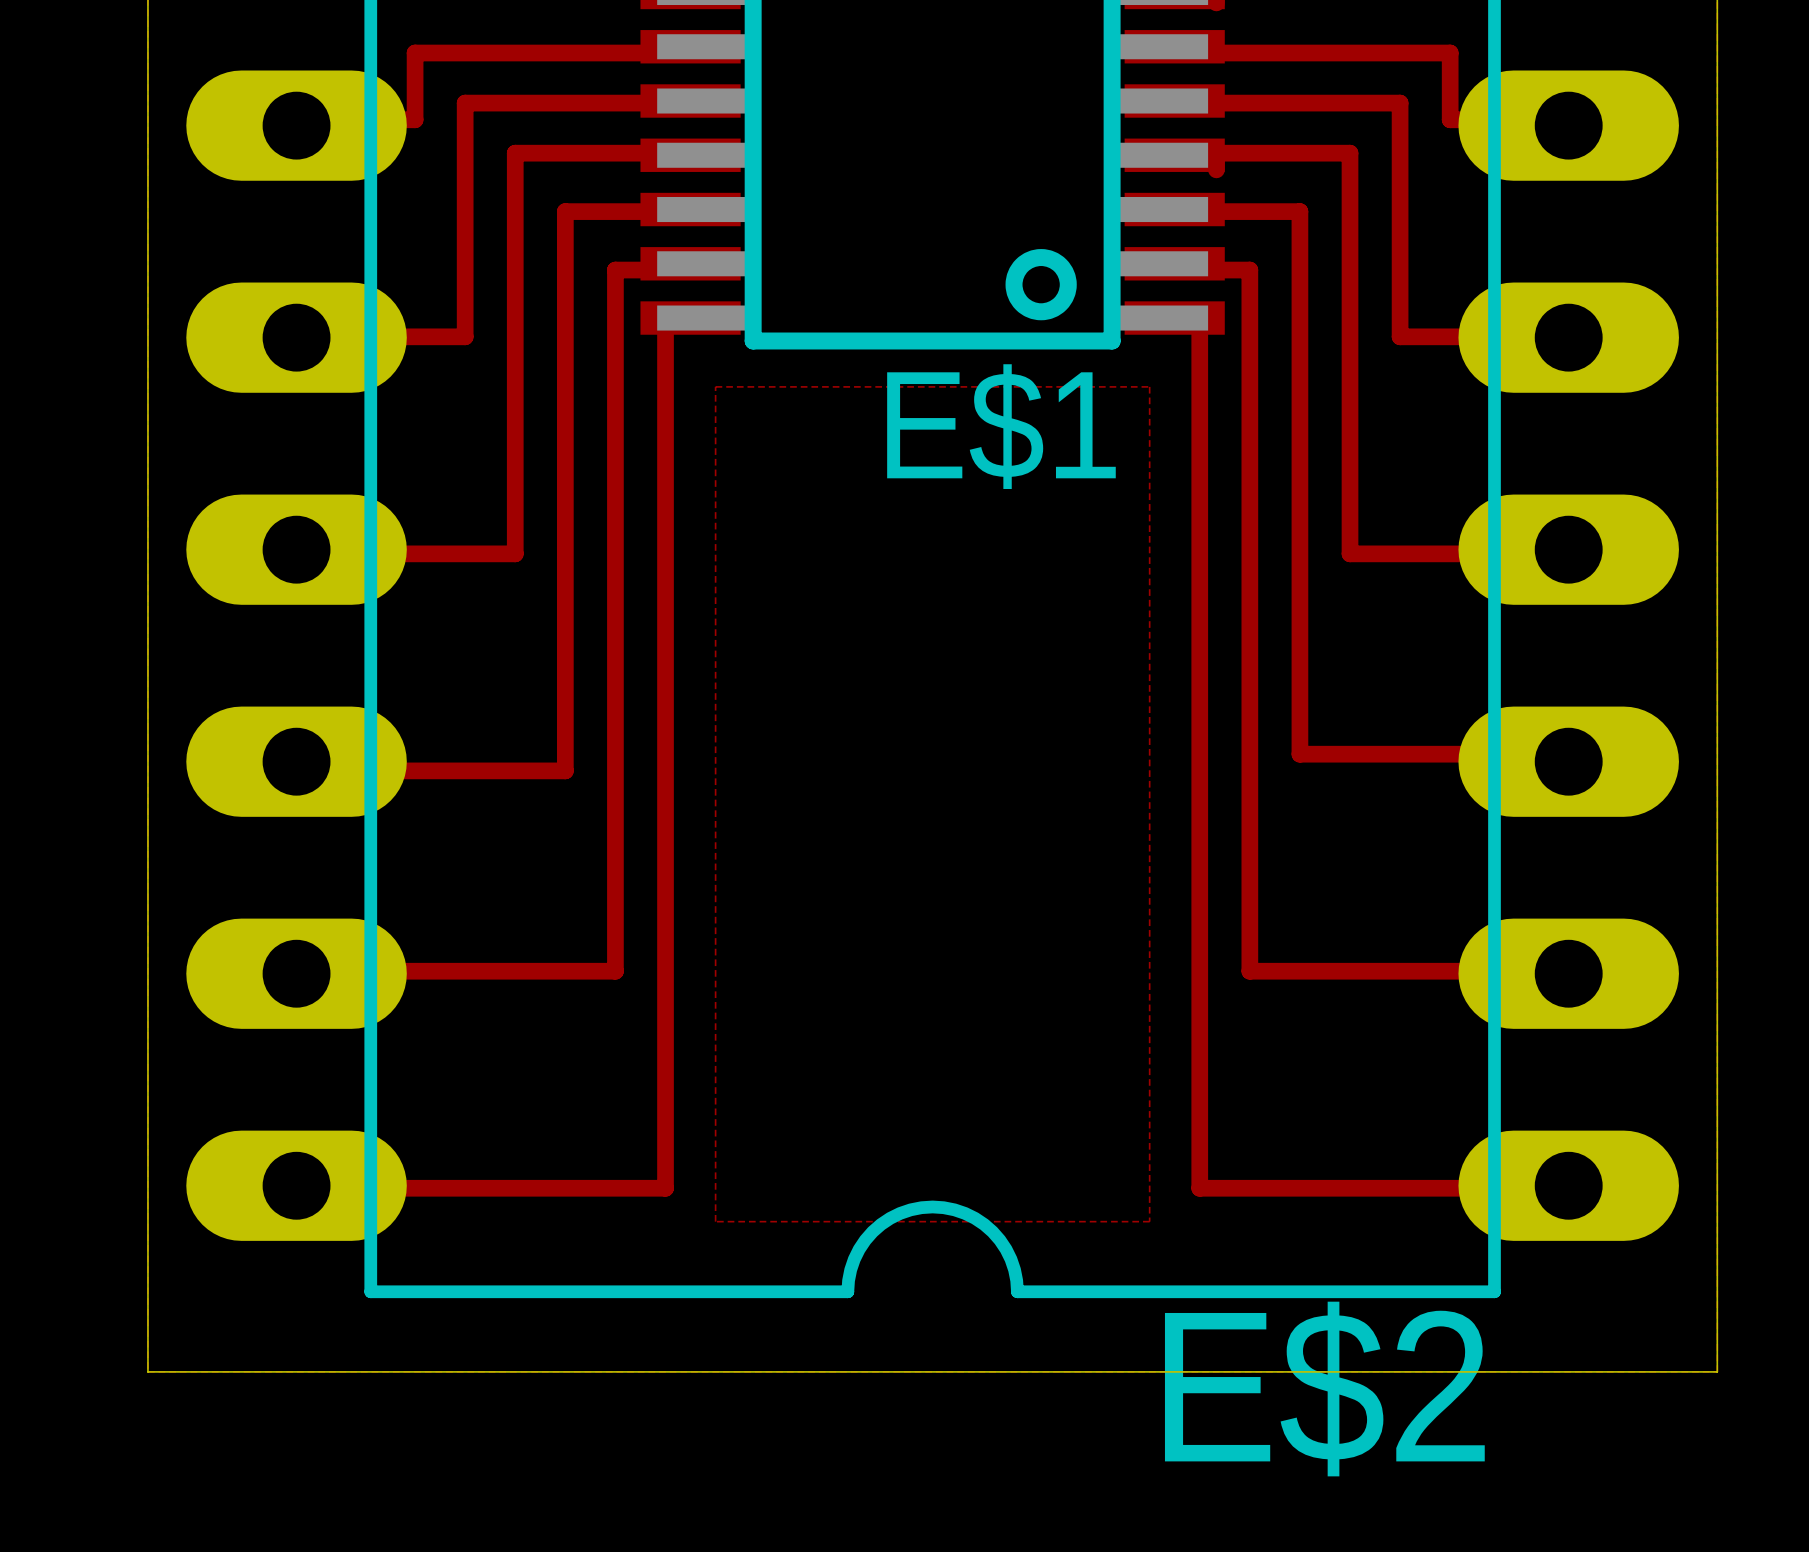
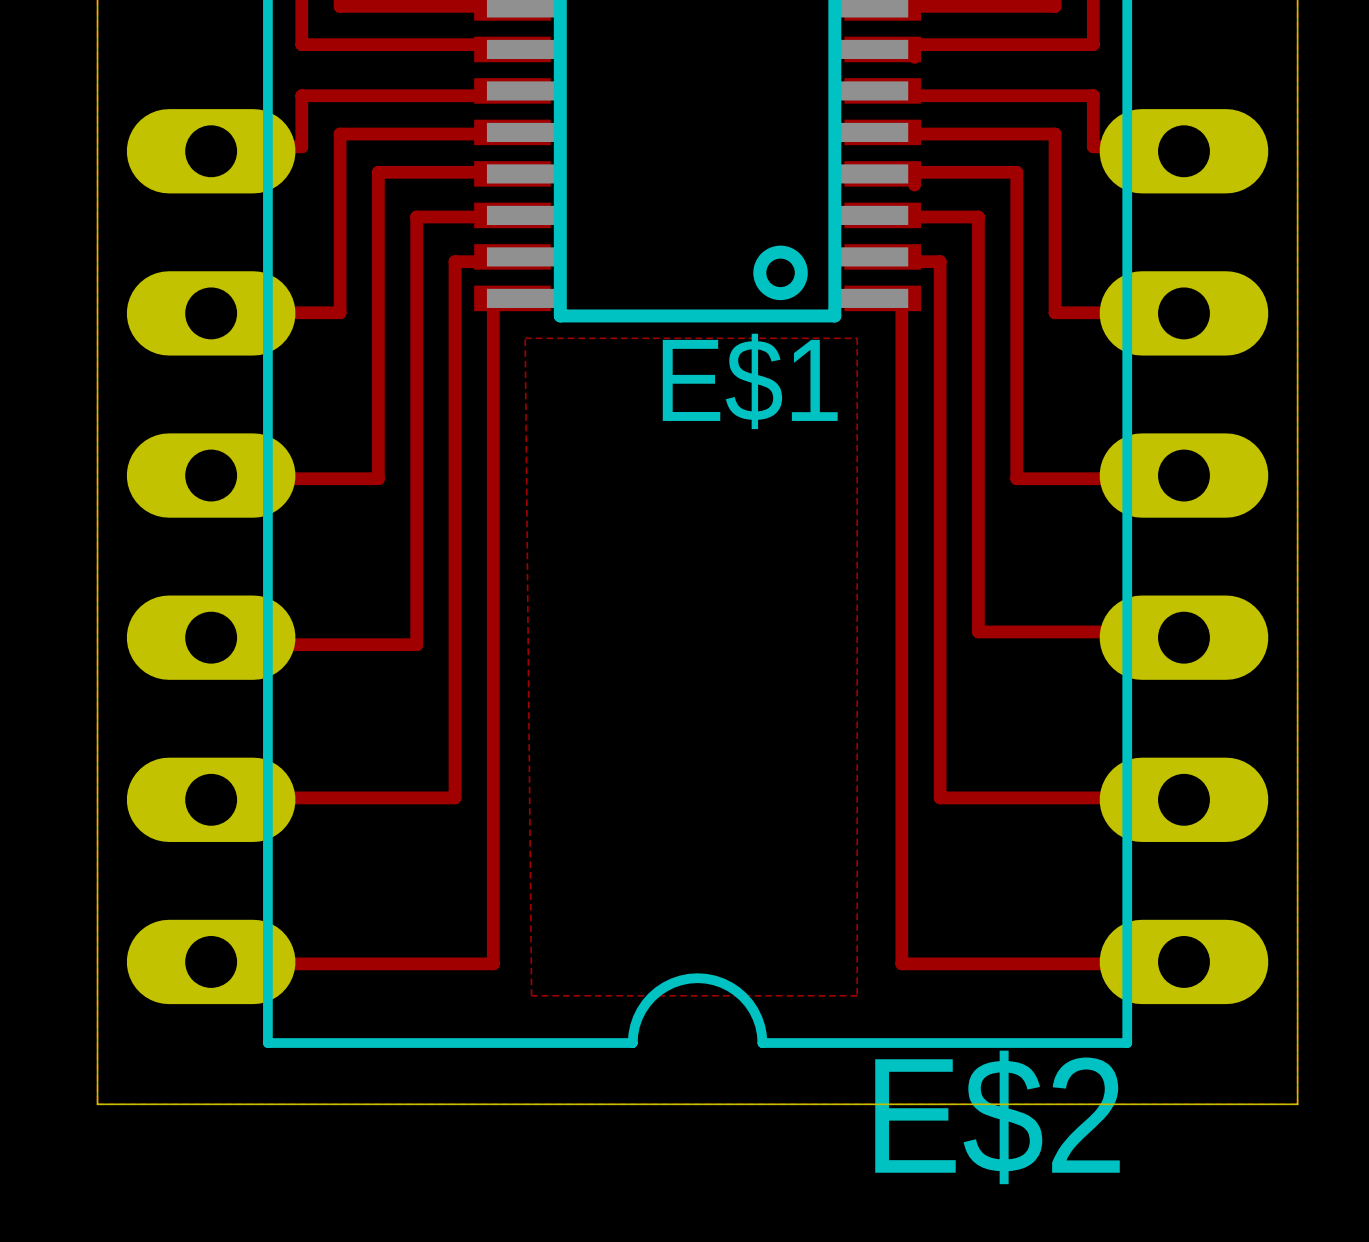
zone outline: (715, 386) (1149, 386) (1149, 1221) (715, 1221) (715, 386) -> (525, 338) (531, 995) (857, 995) (857, 338) (525, 338)

